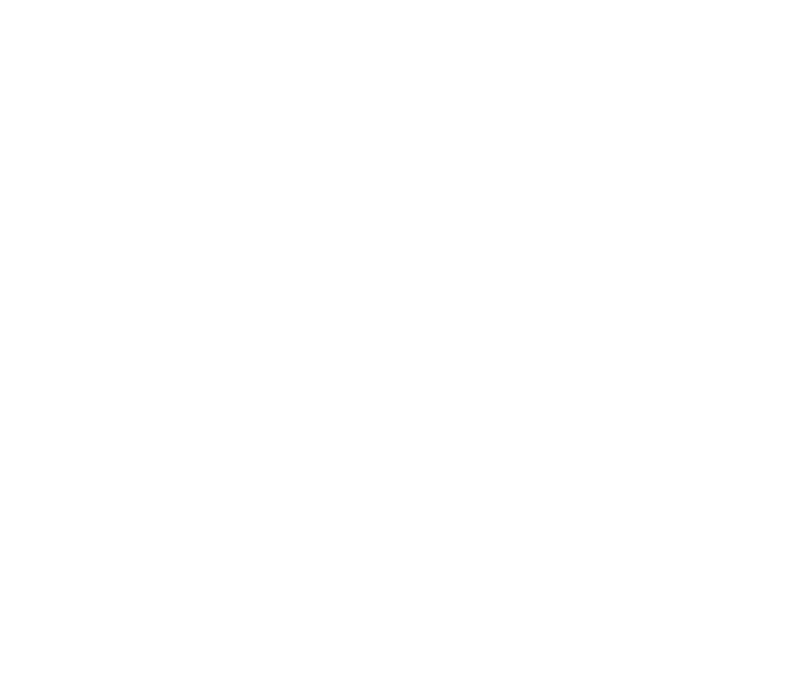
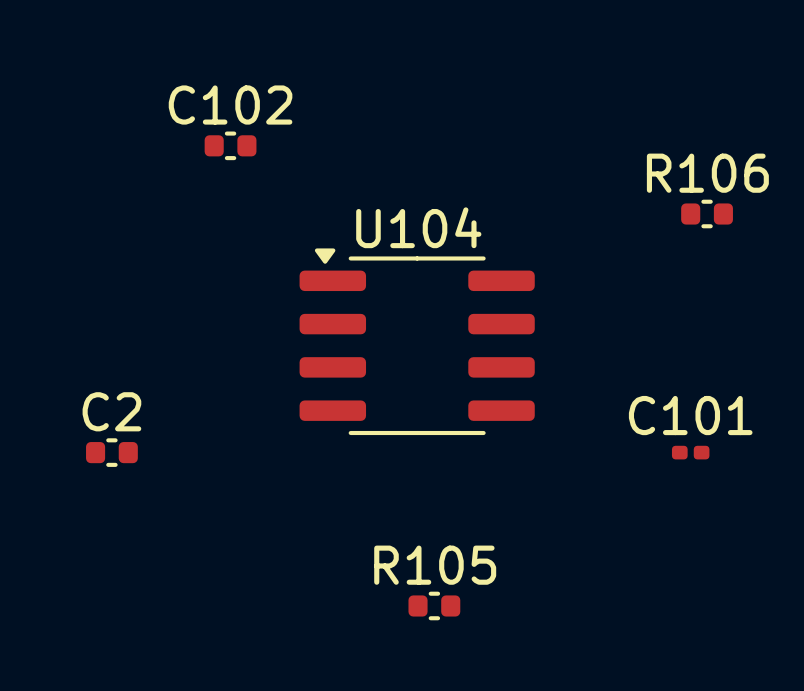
C102: none -> (230, 145)
R106: none -> (707, 214)
U104: none -> (417, 341)
C2: none -> (111, 452)
C101: none -> (690, 452)
R105: none -> (434, 605)

